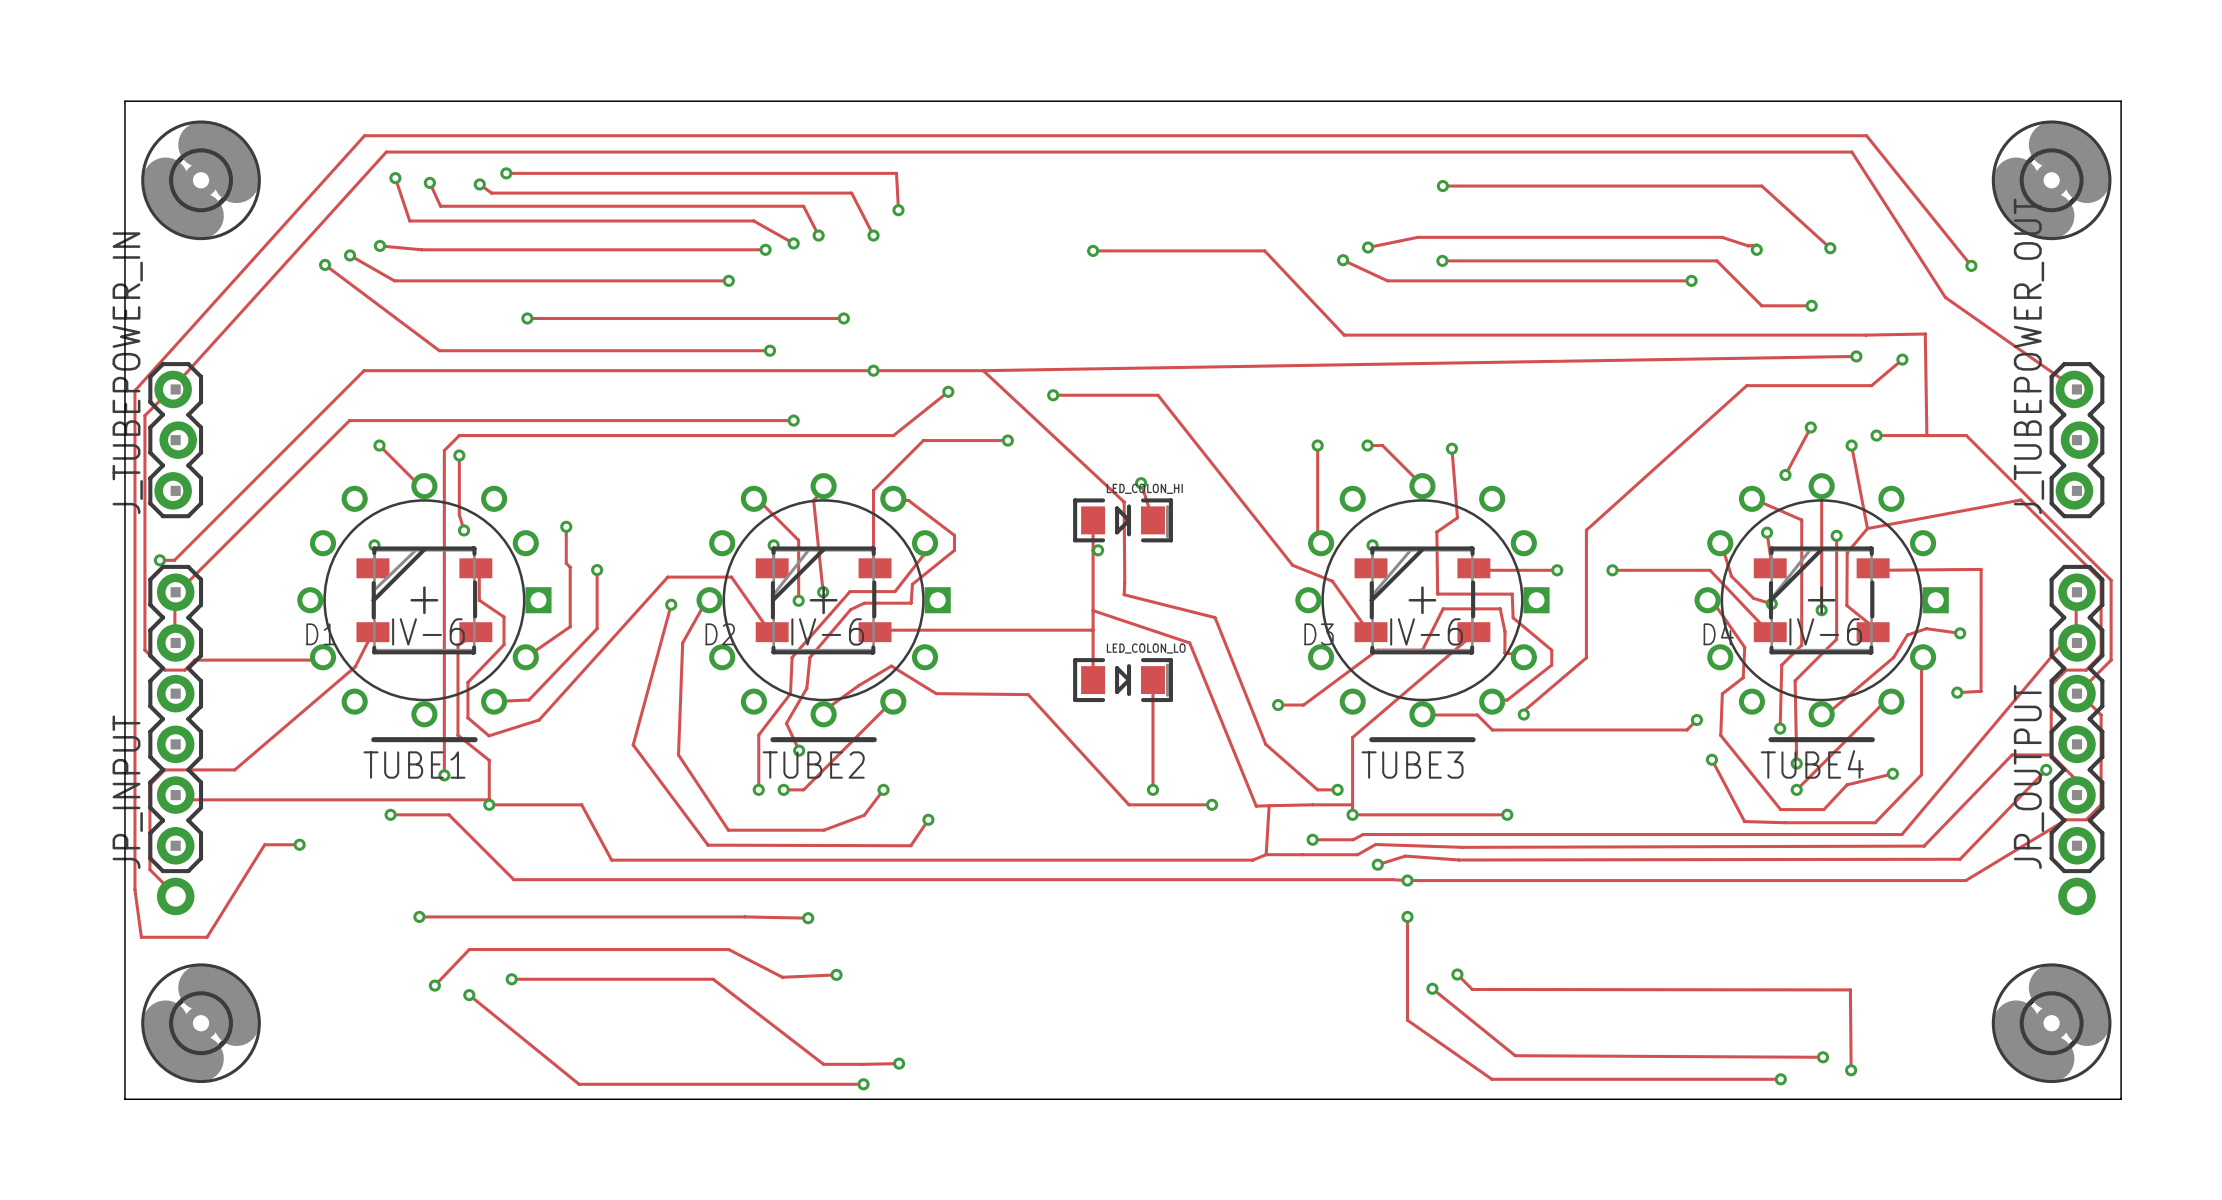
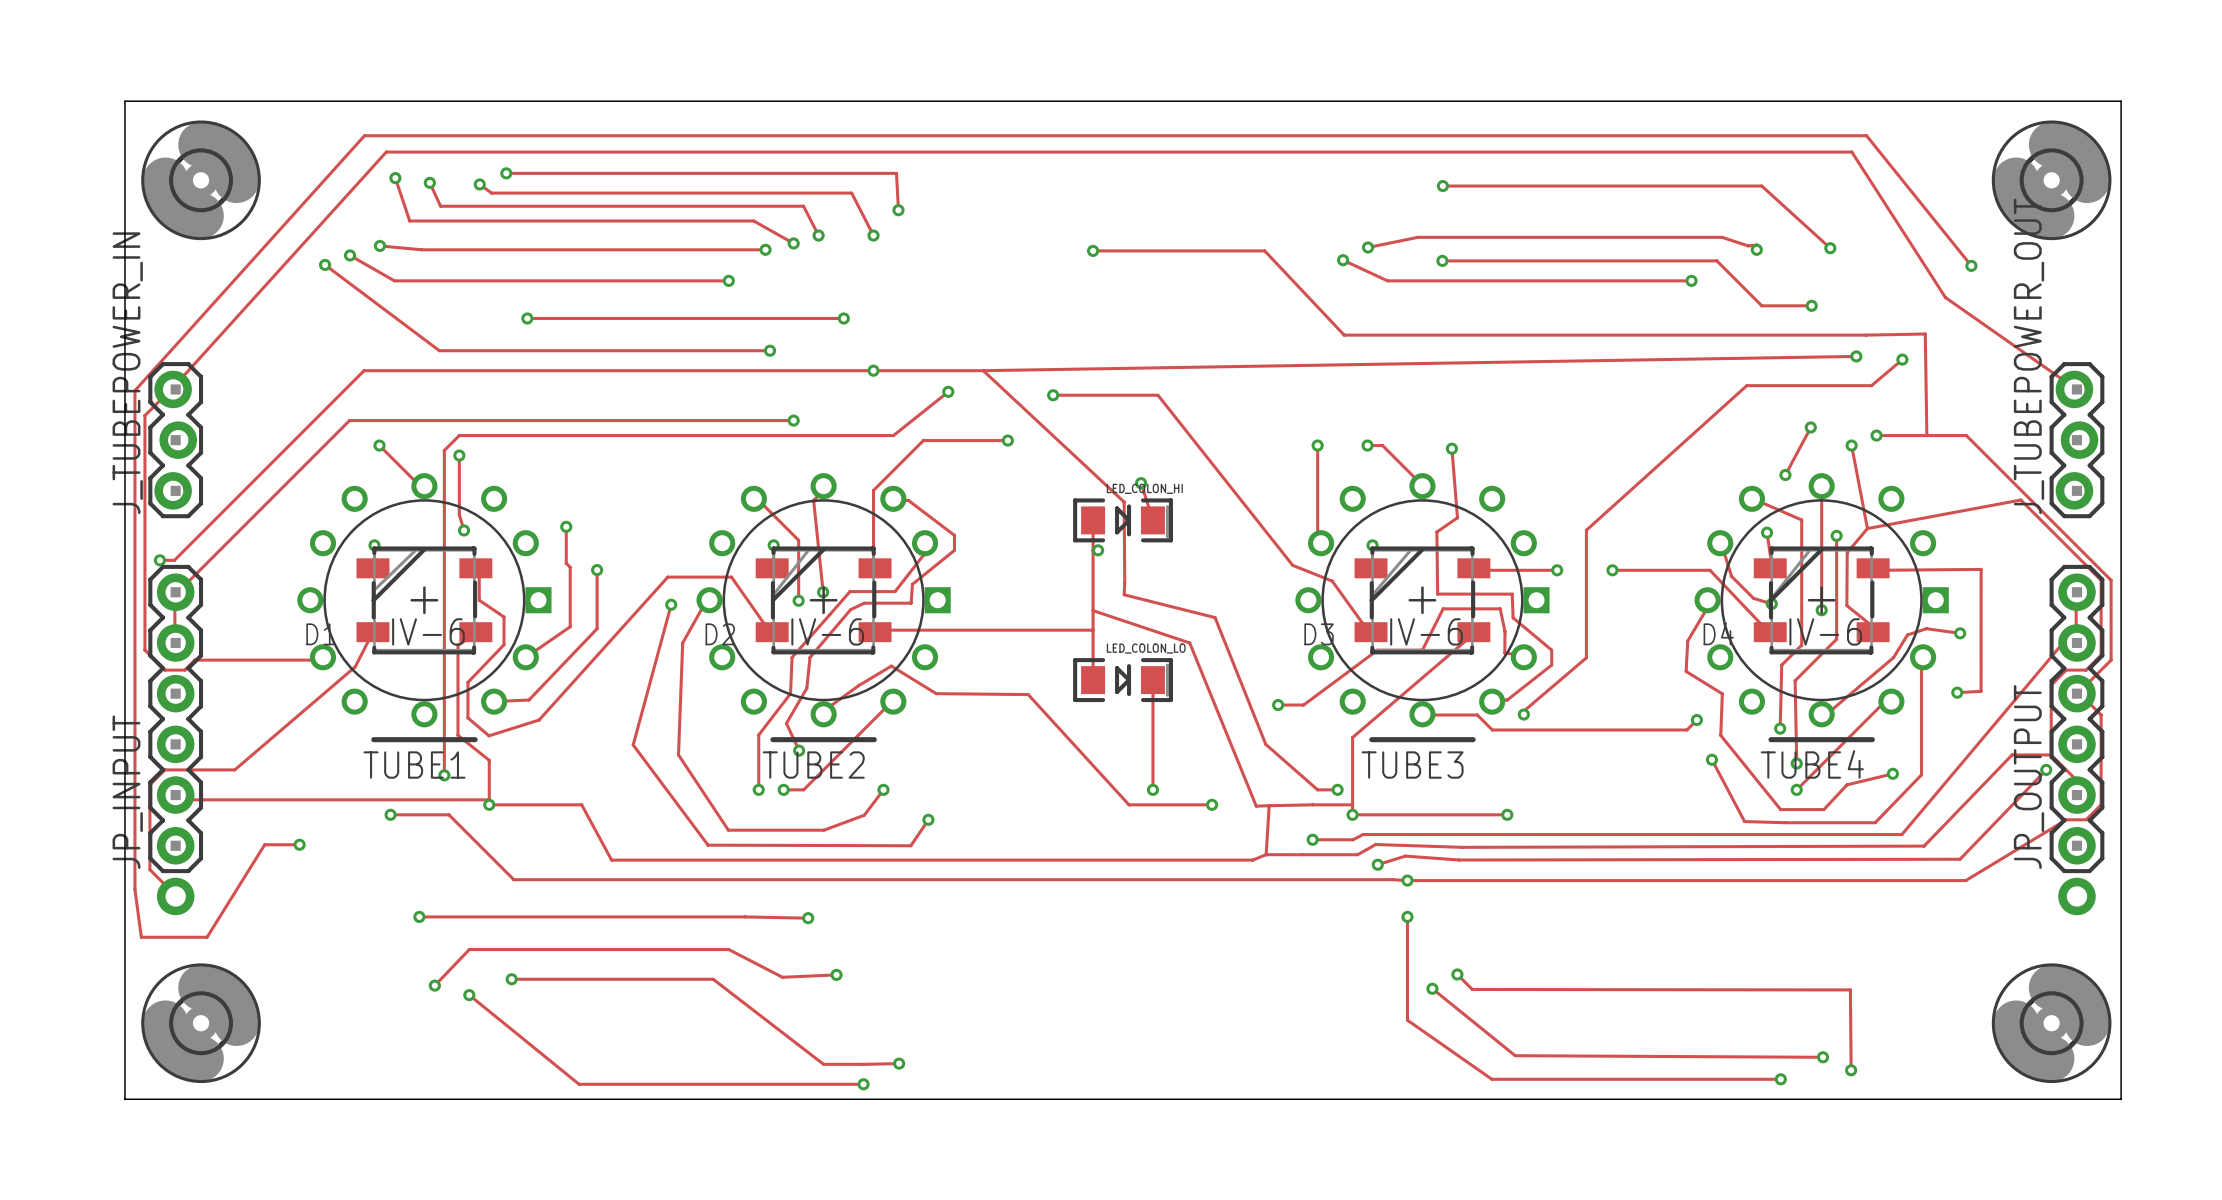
track: (1711, 600) (1744, 647) (1743, 677) (1722, 693) -> (1711, 600) (1687, 641) (1686, 671) (1722, 693)

